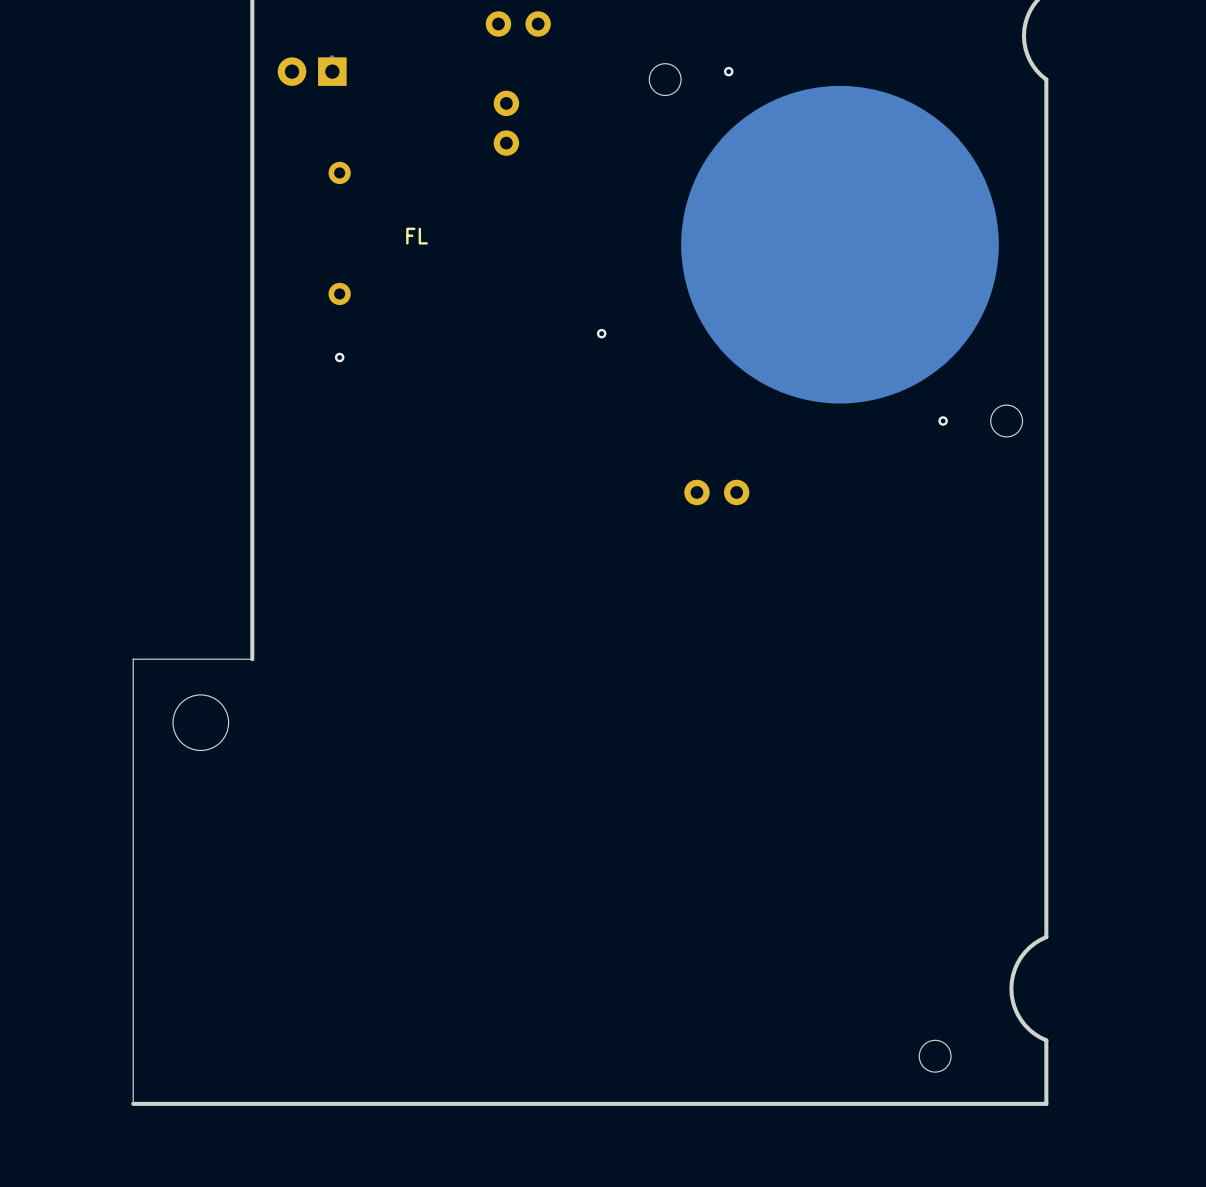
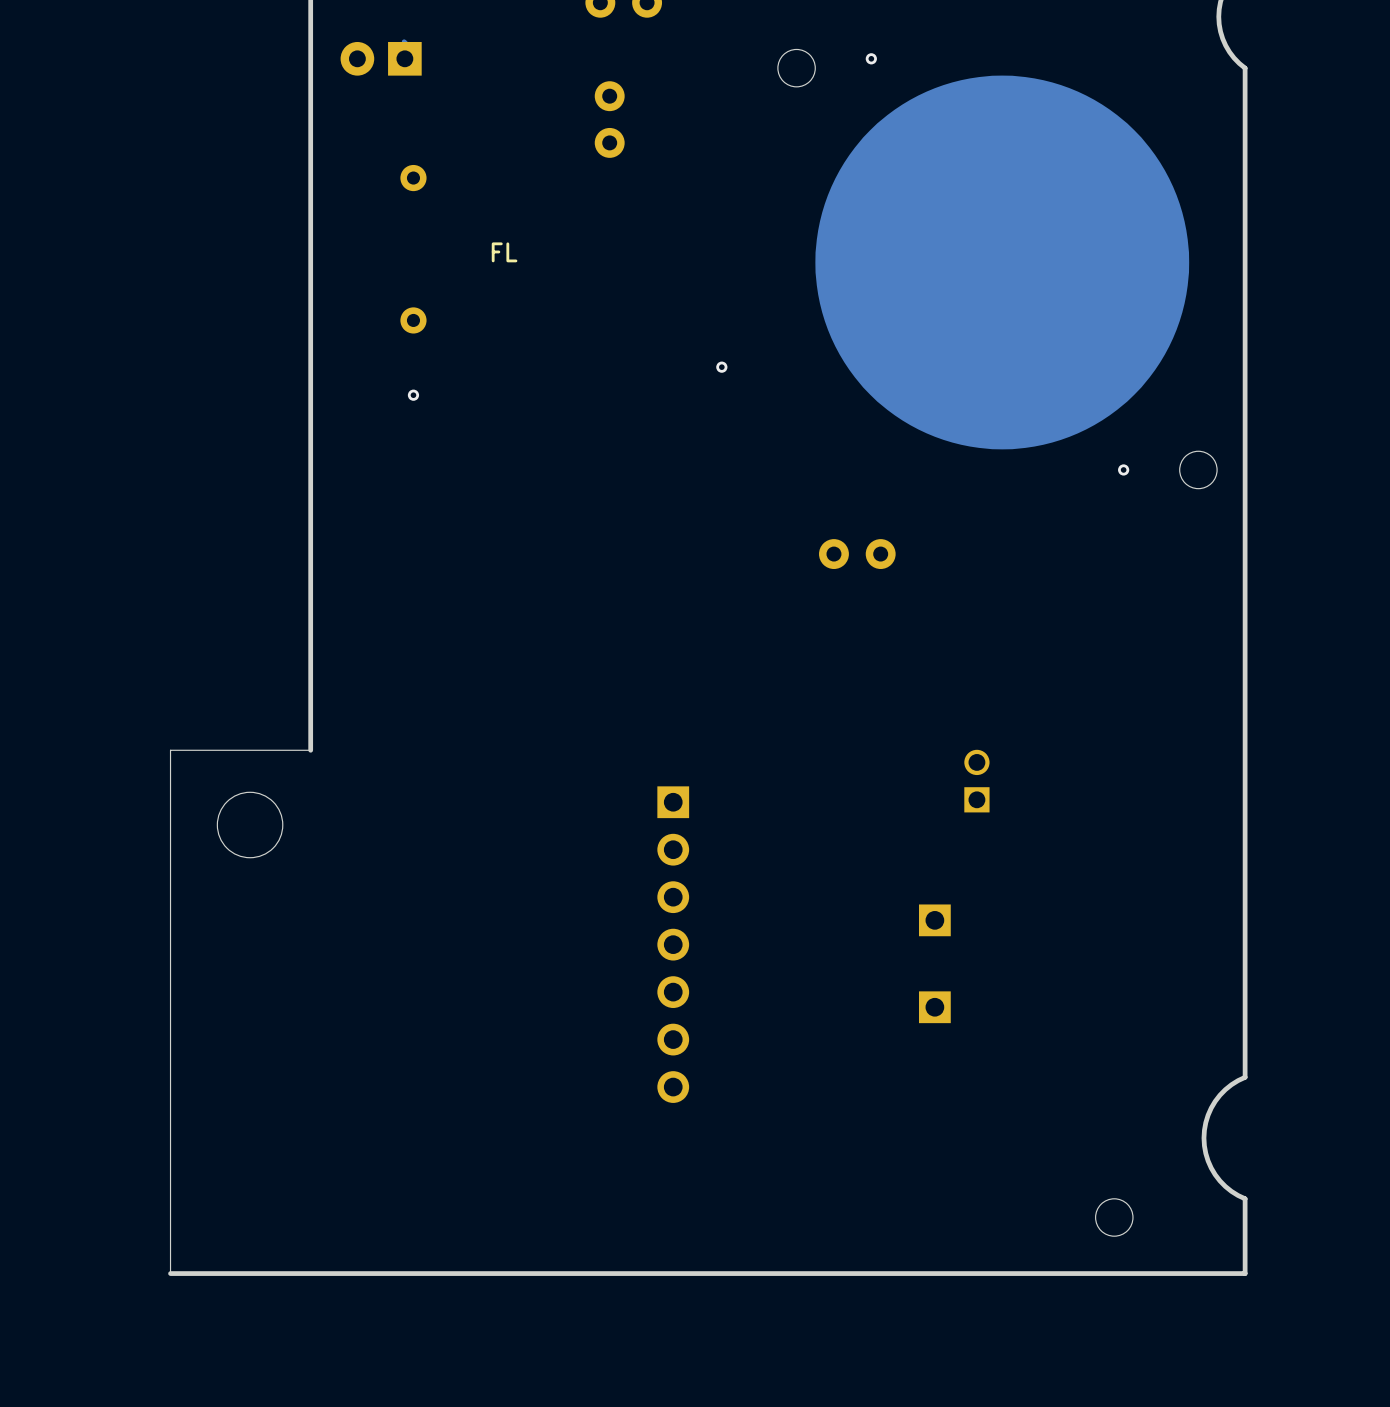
part: none -> (976, 781)
part: none -> (934, 920)
part: none -> (673, 944)
part: none -> (934, 1007)

